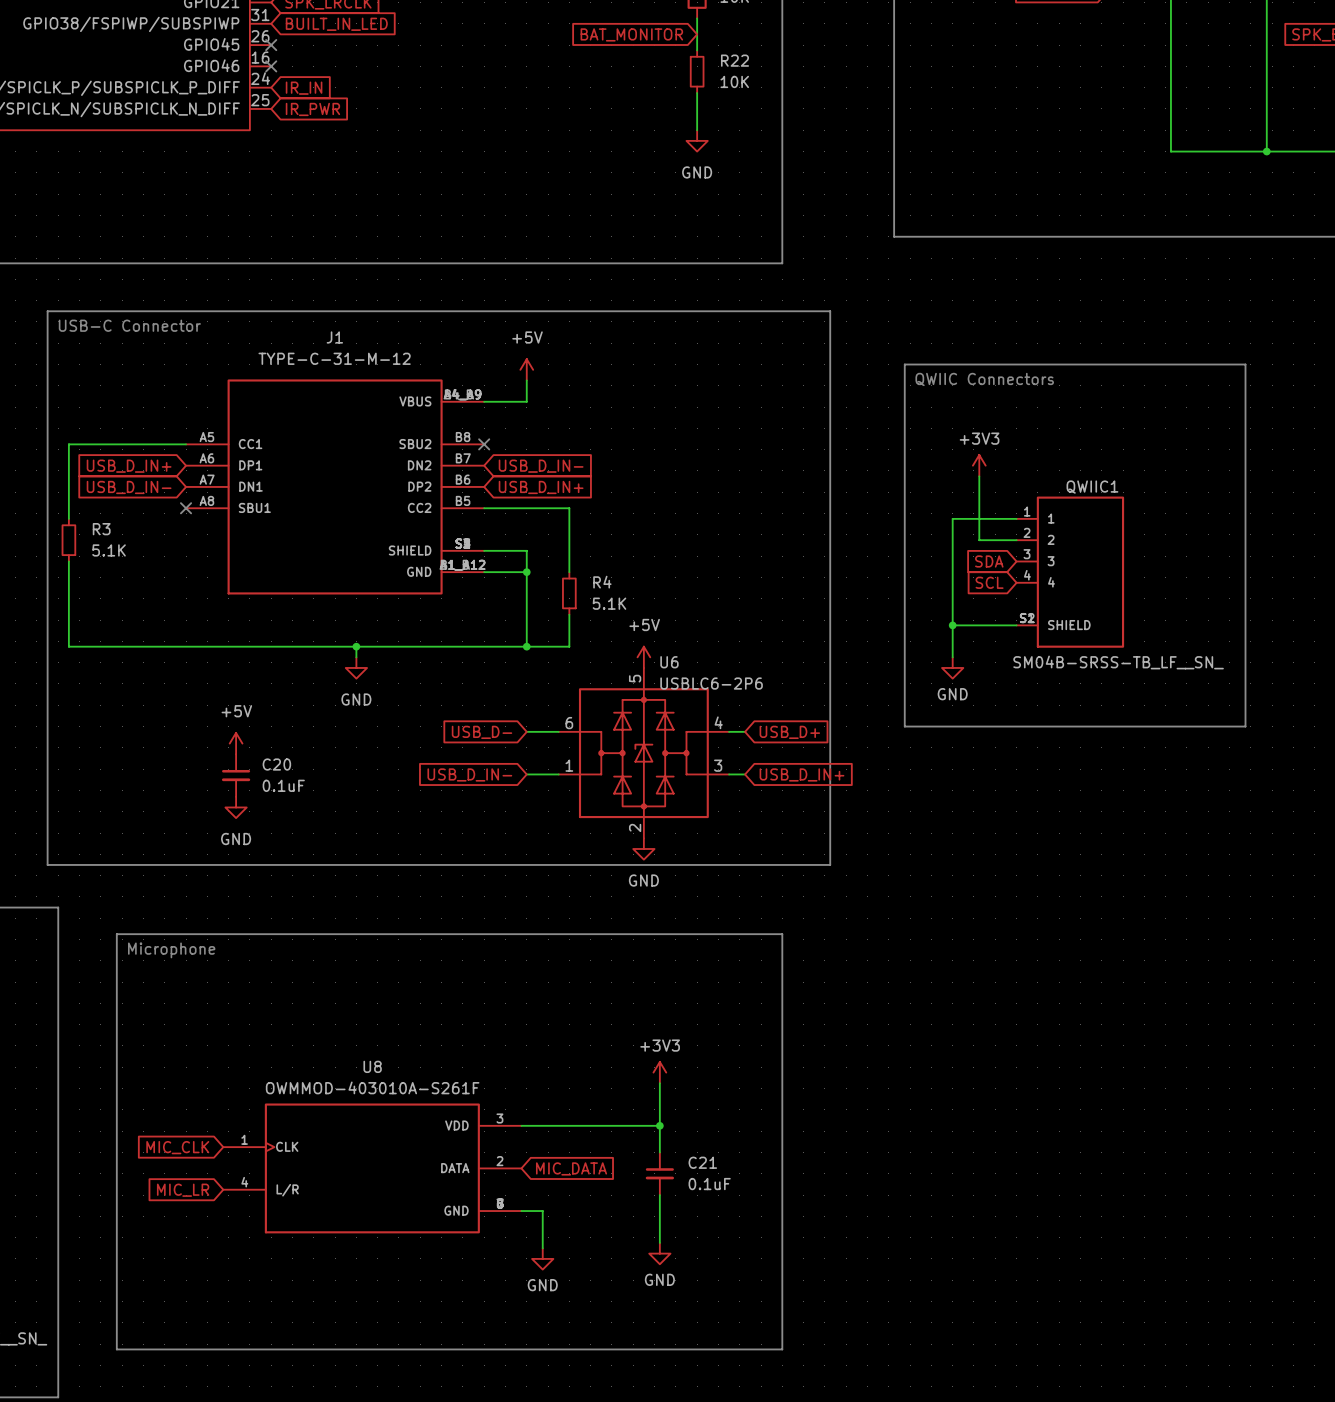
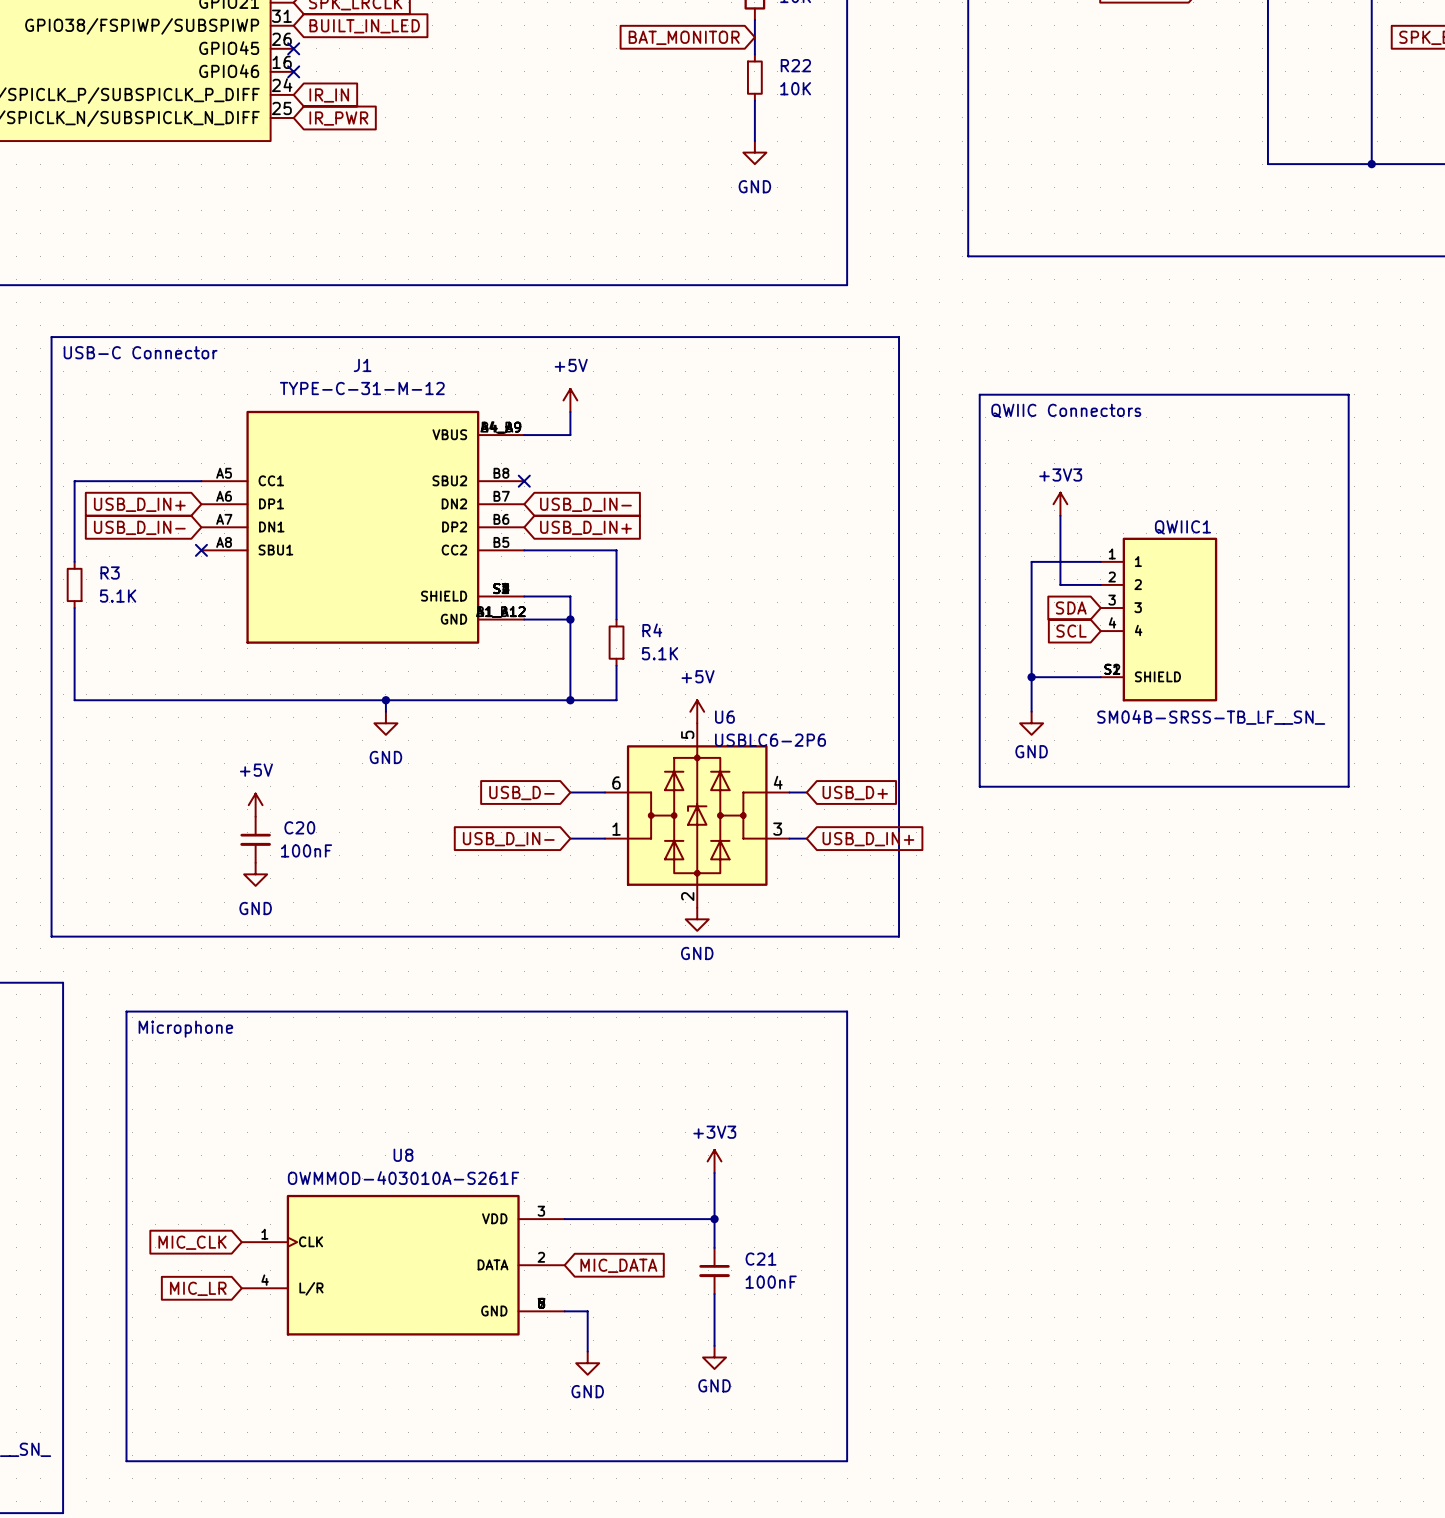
C20 value: 0.1uF (283, 785) -> 100nF (306, 850)
C21 value: 0.1uF (709, 1184) -> 100nF (771, 1282)

